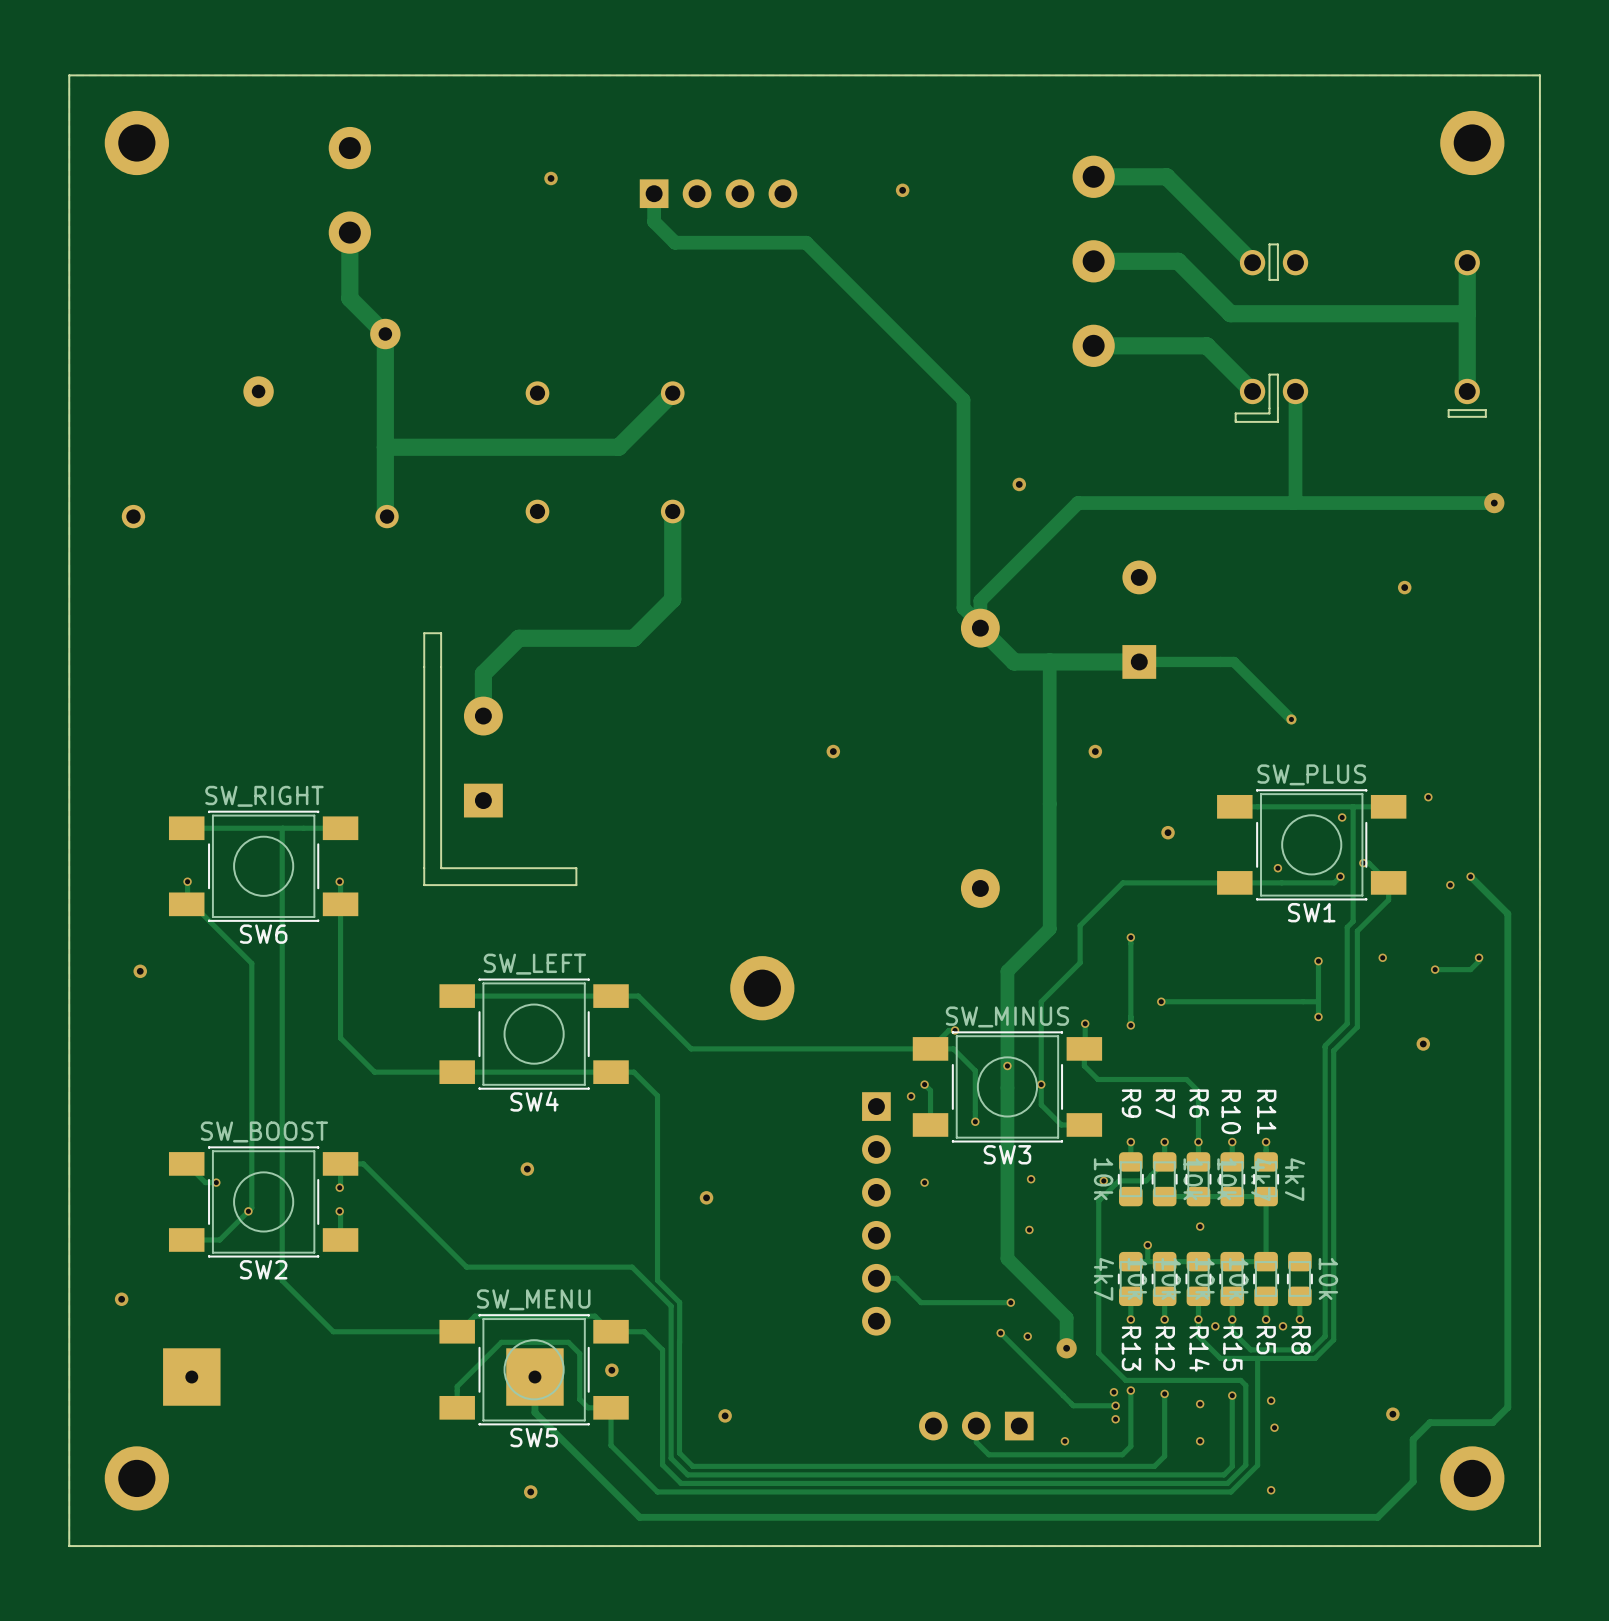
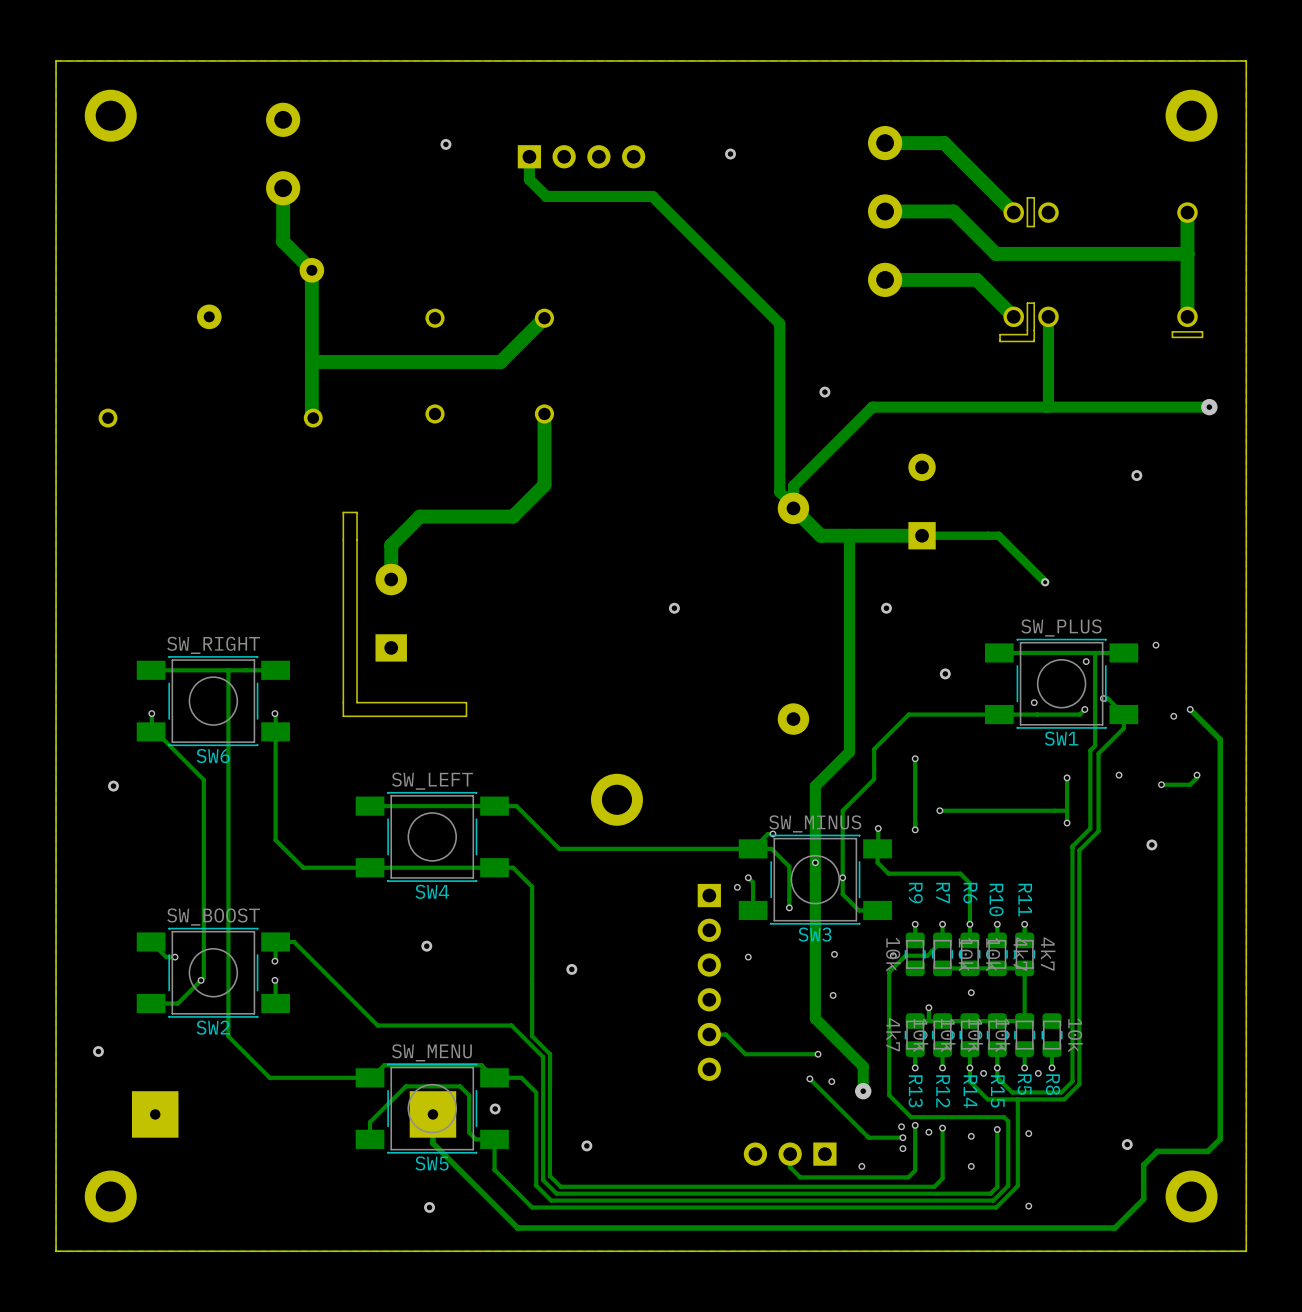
via: none -> (928, 1132)
via: (1274, 1427) -> none

